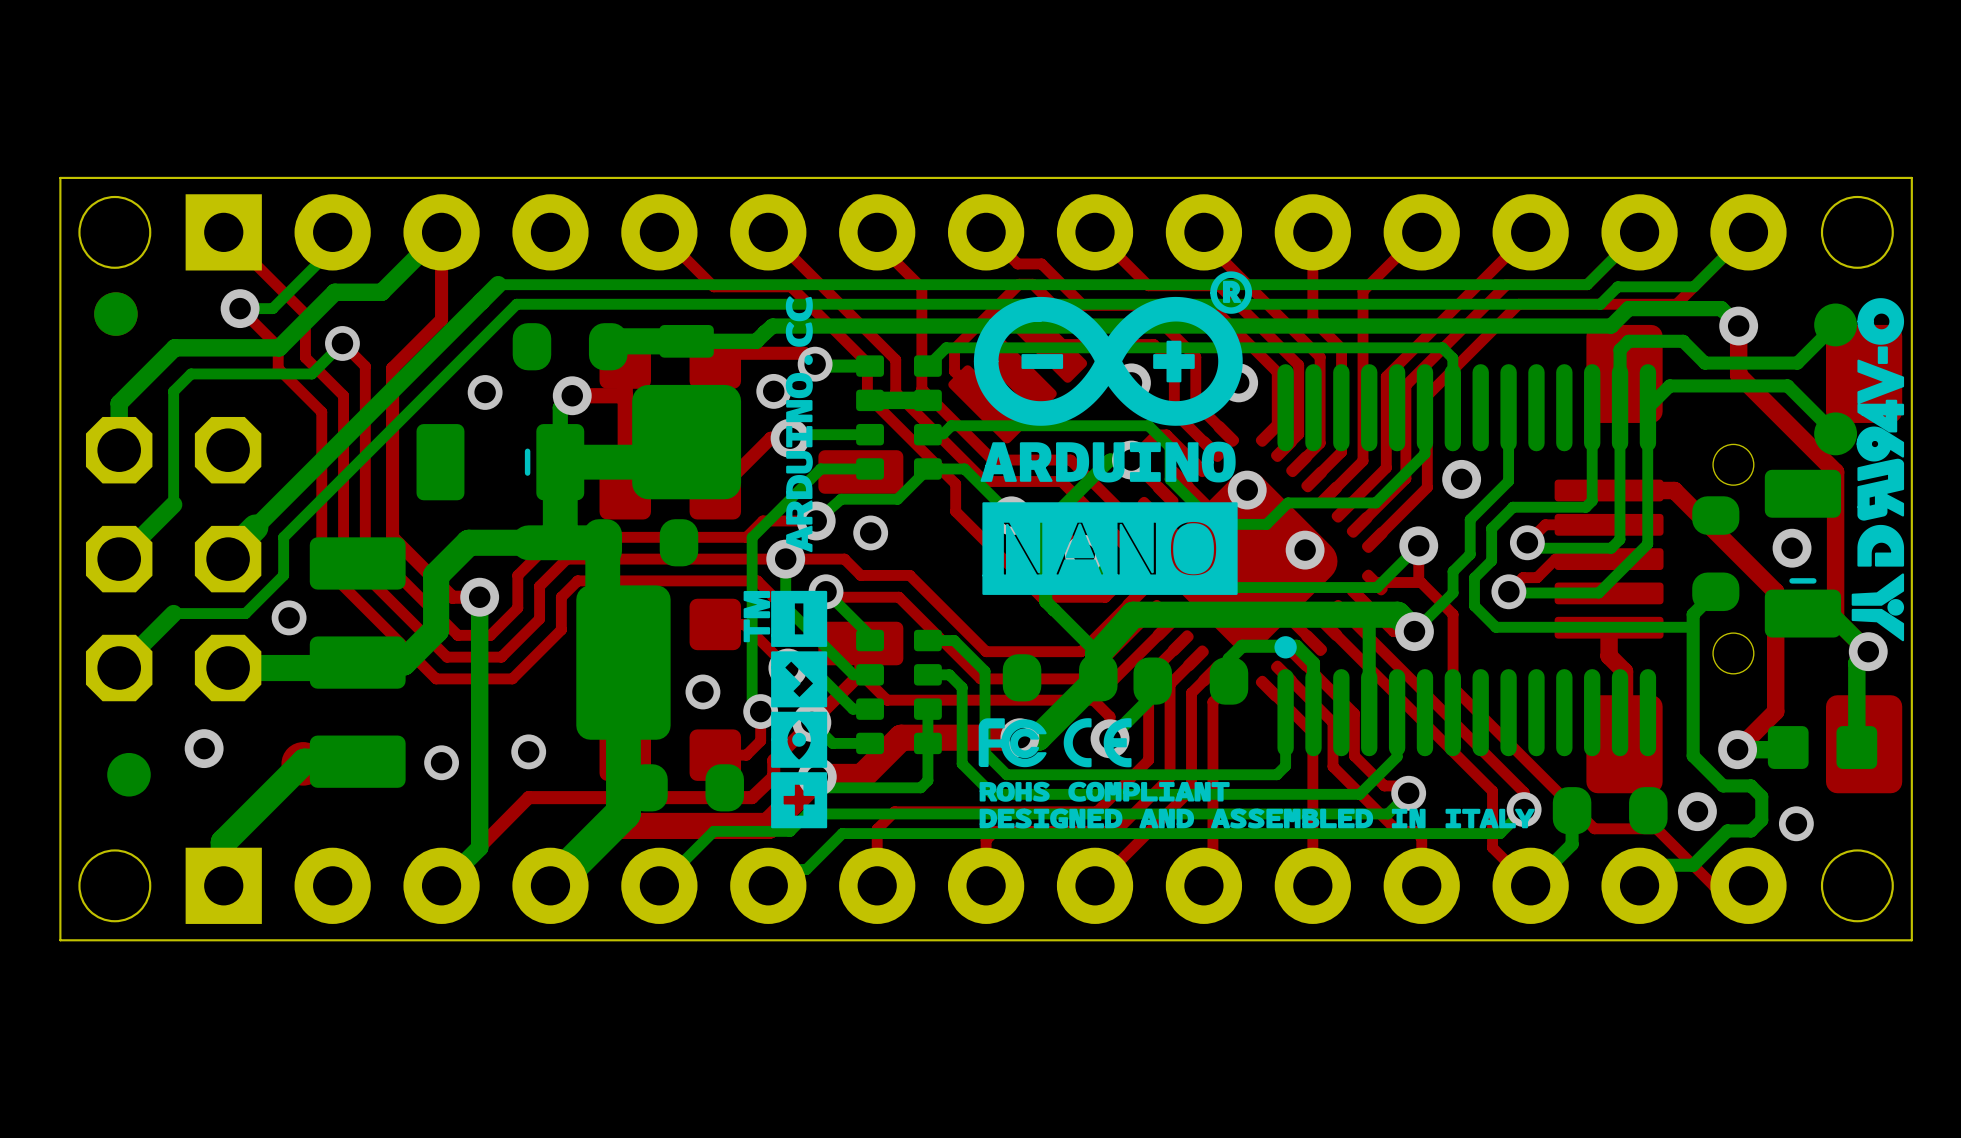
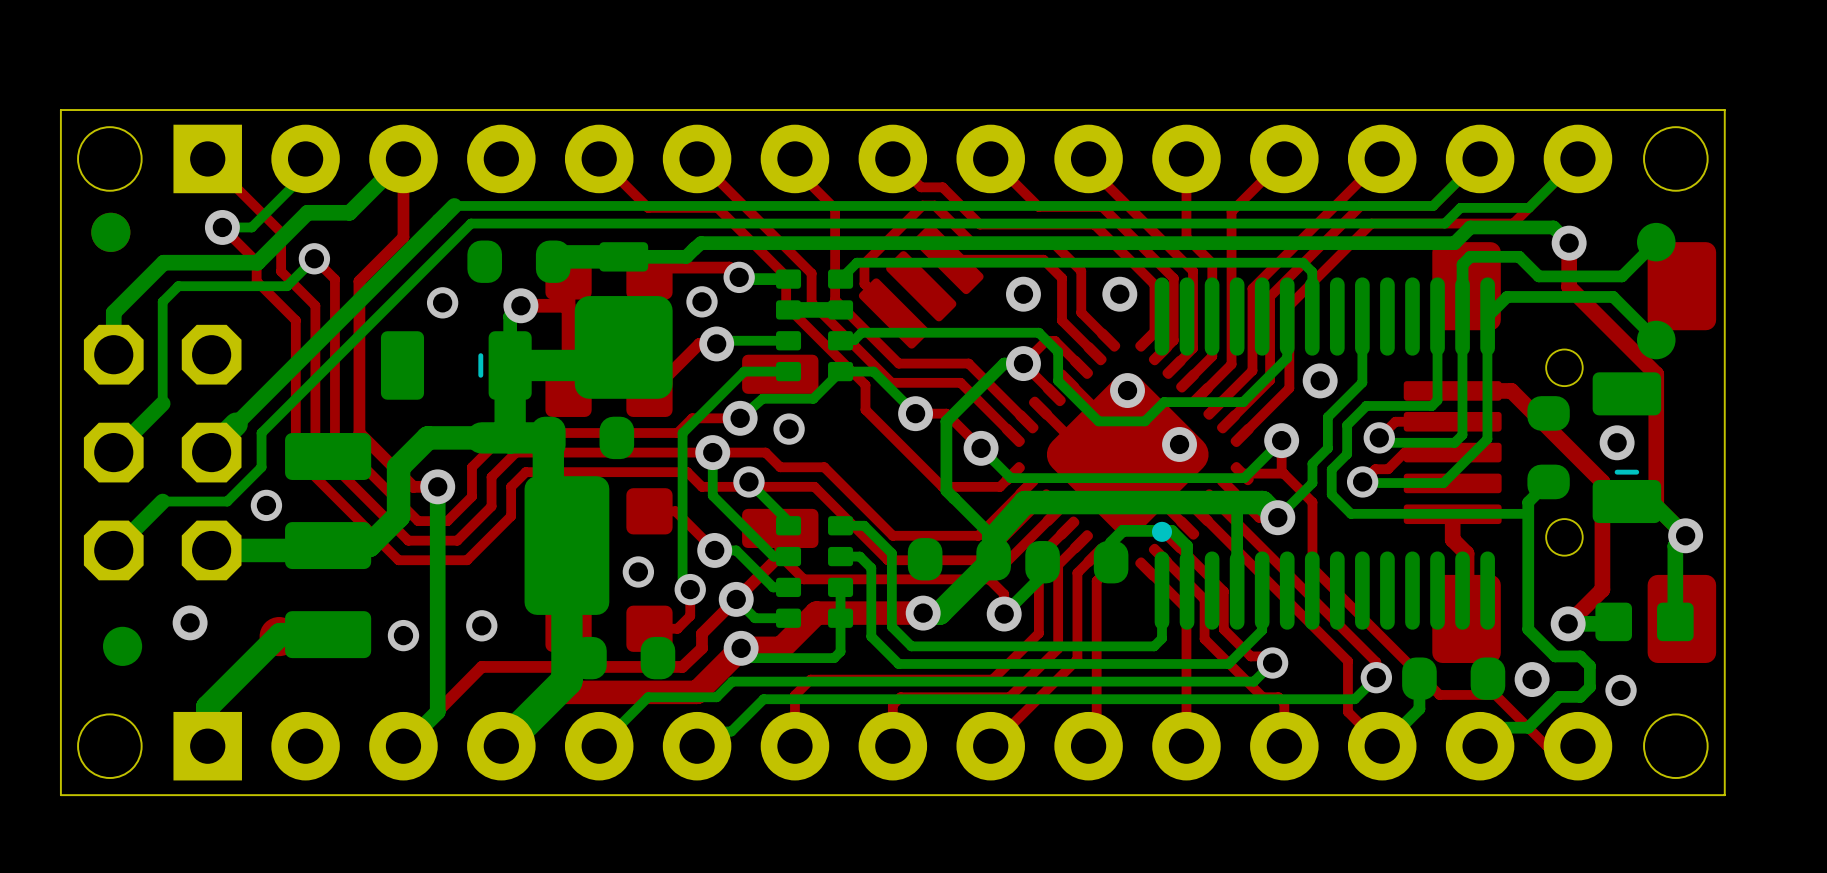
drawing: [743, 271, 1905, 829] -> none

